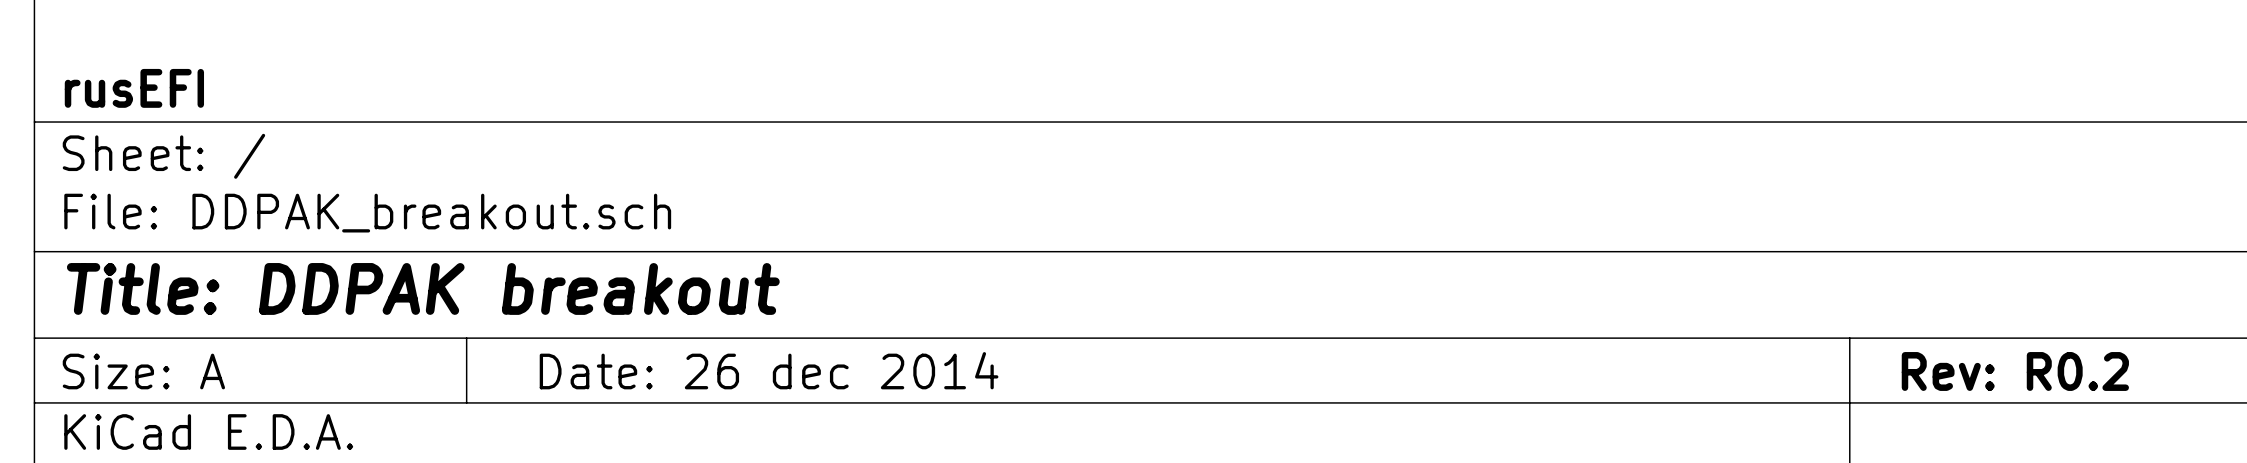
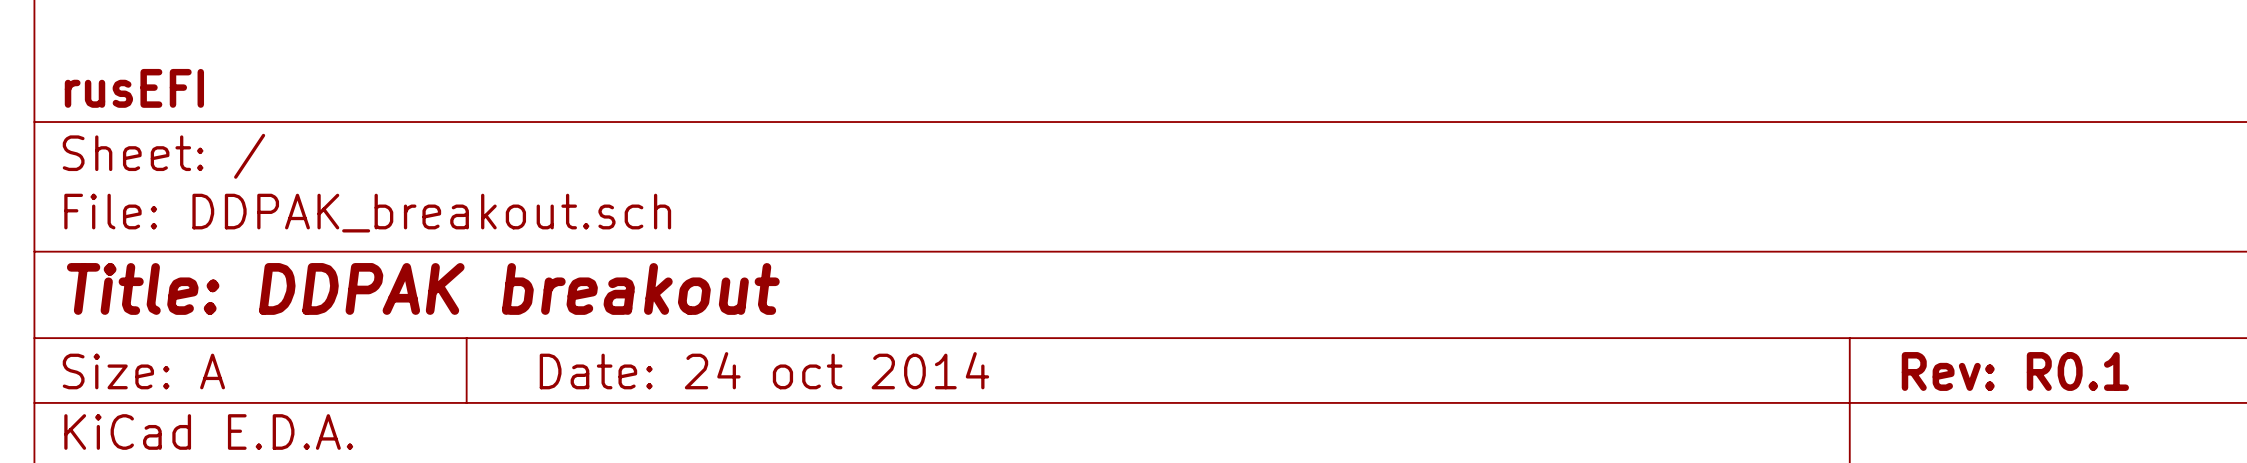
title block: Date: 26 dec 2014 (769, 370) -> Date: 24 oct 2014 (764, 370)
title block: Rev: R0.2 (2015, 371) -> Rev: R0.1 (2015, 371)

